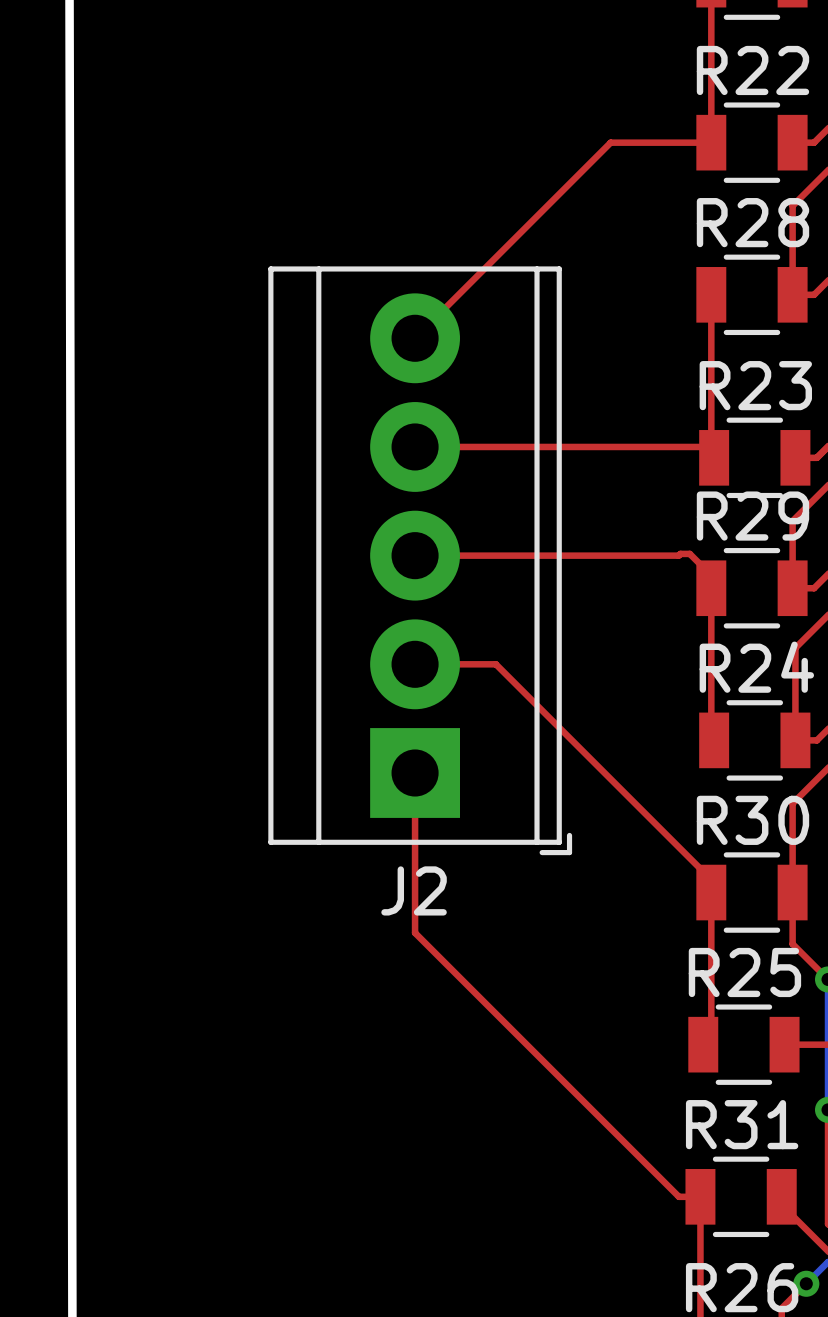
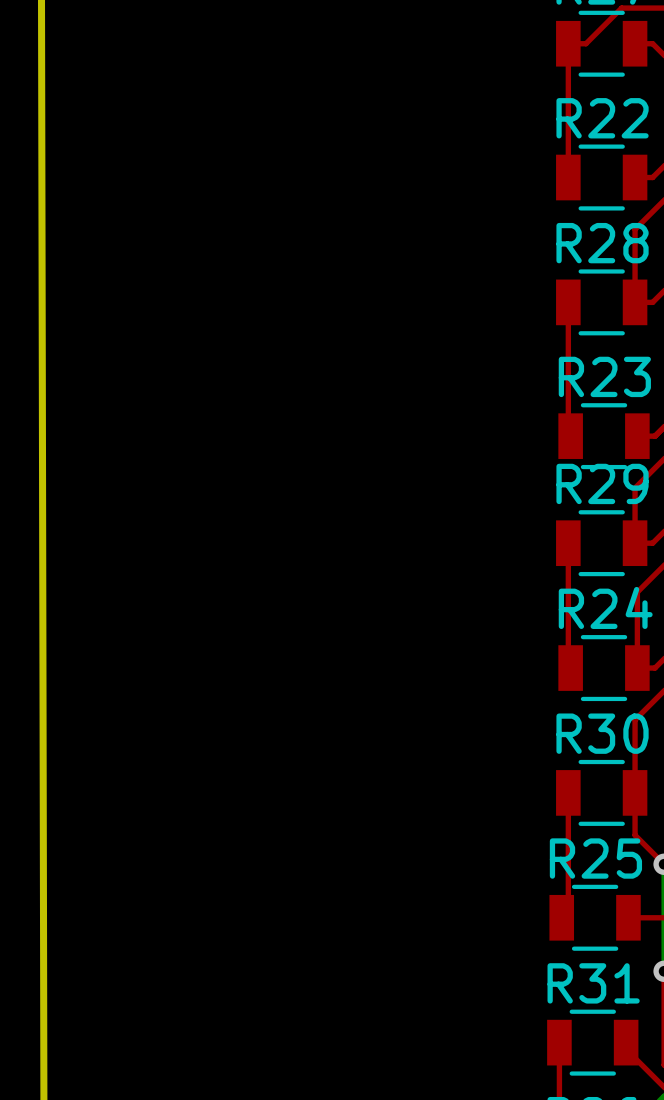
top track: (711, 142) (610, 142) (415, 338) -> none
top track: (415, 446) (703, 446) (711, 455) -> none
top track: (415, 555) (678, 555) (689, 553) (711, 575) (711, 588) -> none
J2: (420, 560) -> none
top track: (415, 664) (495, 664) (711, 879) (711, 892) -> none
top track: (415, 772) (415, 932) (678, 1196) (700, 1196) -> none

